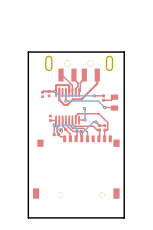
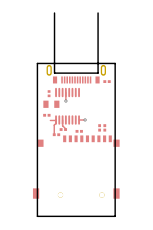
part: none -> (76, 47)
board edge: (124, 52) (28, 52) (28, 217) (124, 217) (124, 52) -> (115, 63) (115, 216) (37, 216) (37, 63) (115, 63)
part: (79, 68) -> none
top track: (61, 75) (72, 85) (72, 92) -> none
top track: (73, 75) (73, 78) (77, 82) (75, 92) -> none
top track: (84, 75) (84, 78) (80, 82) (79, 92) -> none
top track: (97, 75) (97, 83) (81, 99) (73, 99) (67, 104) (64, 104) (59, 99) (59, 88) -> none
via: (54, 91) -> none
top track: (42, 92) (56, 92) (56, 85) (68, 85) (69, 92) -> none
bottom track: (56, 92) (59, 95) (94, 95) -> none
part: (42, 94) -> none
via: (94, 95) -> none
top track: (103, 95) (94, 95) -> none
top track: (114, 97) (111, 100) (103, 100) -> none
part rotation: 0° (103, 98) -> 90° clockwise (107, 81)
part position: (103, 98) -> (107, 81)
bottom track: (65, 101) (98, 101) (104, 107) -> none
part rotation: 0° (114, 102) -> 90° clockwise (51, 104)
part position: (114, 102) -> (51, 104)
top track: (104, 107) (114, 108) -> none
via: (104, 107) -> none
bottom track: (84, 108) (85, 119) -> none
via: (84, 108) -> none
part footprint: [48, 114, 52, 122] -> [43, 113, 51, 117]
top track: (59, 120) (57, 131) (60, 136) (64, 136) -> none
top track: (65, 120) (65, 124) (72, 131) (77, 131) (76, 136) -> none
top track: (69, 120) (69, 124) (73, 128) (83, 128) (87, 132) (87, 136) -> none
top track: (72, 120) (74, 126) (93, 126) (99, 130) (98, 136) -> none
top track: (75, 120) (78, 113) (98, 113) (107, 122) (107, 129) (104, 130) (104, 136) -> none
top track: (95, 122) (99, 125) (104, 125) -> none
bottom track: (95, 122) (93, 122) (81, 133) (72, 125) (54, 125) (61, 131) -> none
via: (54, 125) -> none
top track: (65, 129) (70, 136) -> none
via: (61, 131) -> none
via: (81, 133) -> none

